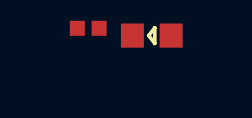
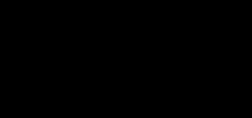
part: (88, 28) -> none
part: (151, 35) -> none

